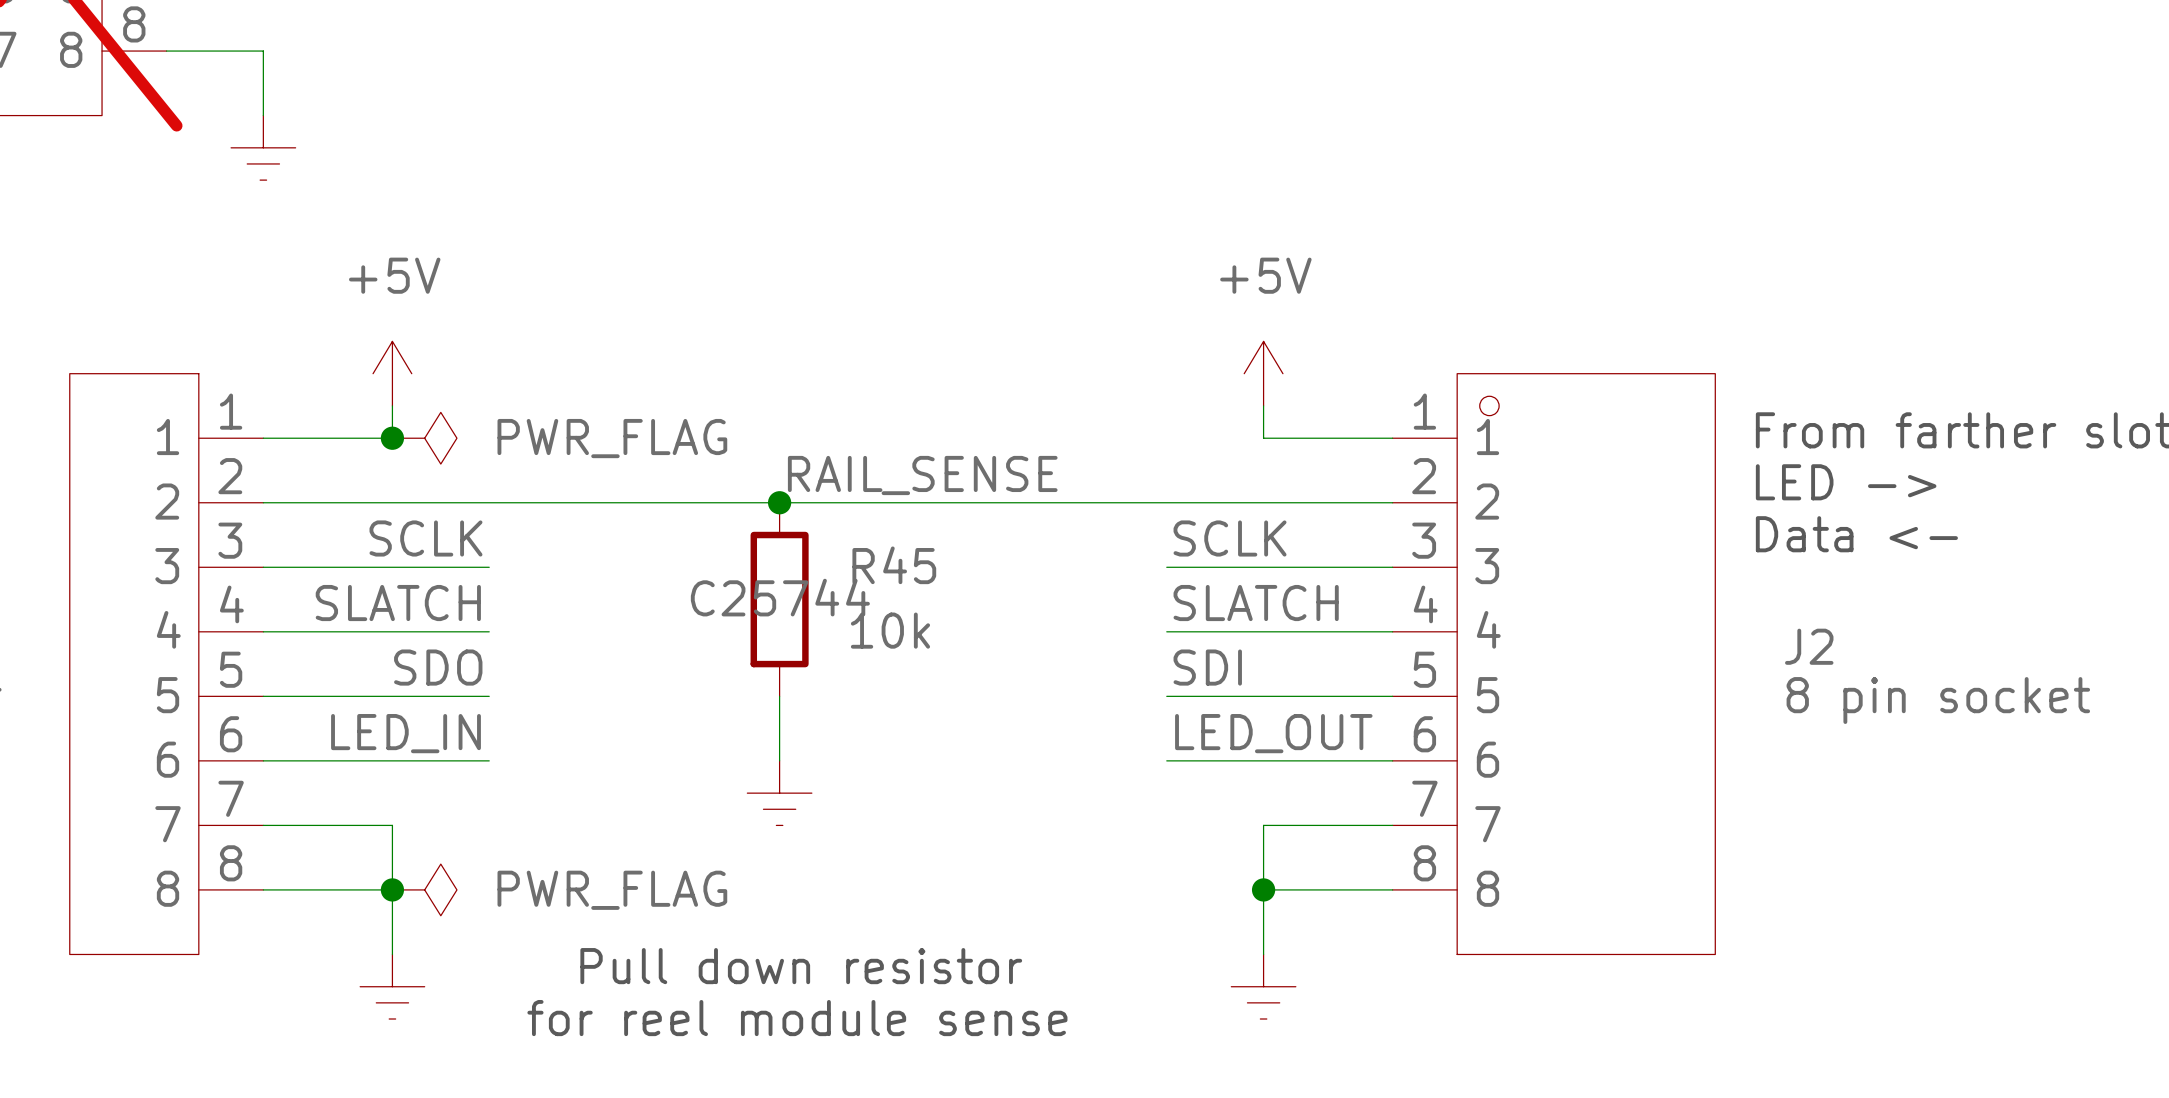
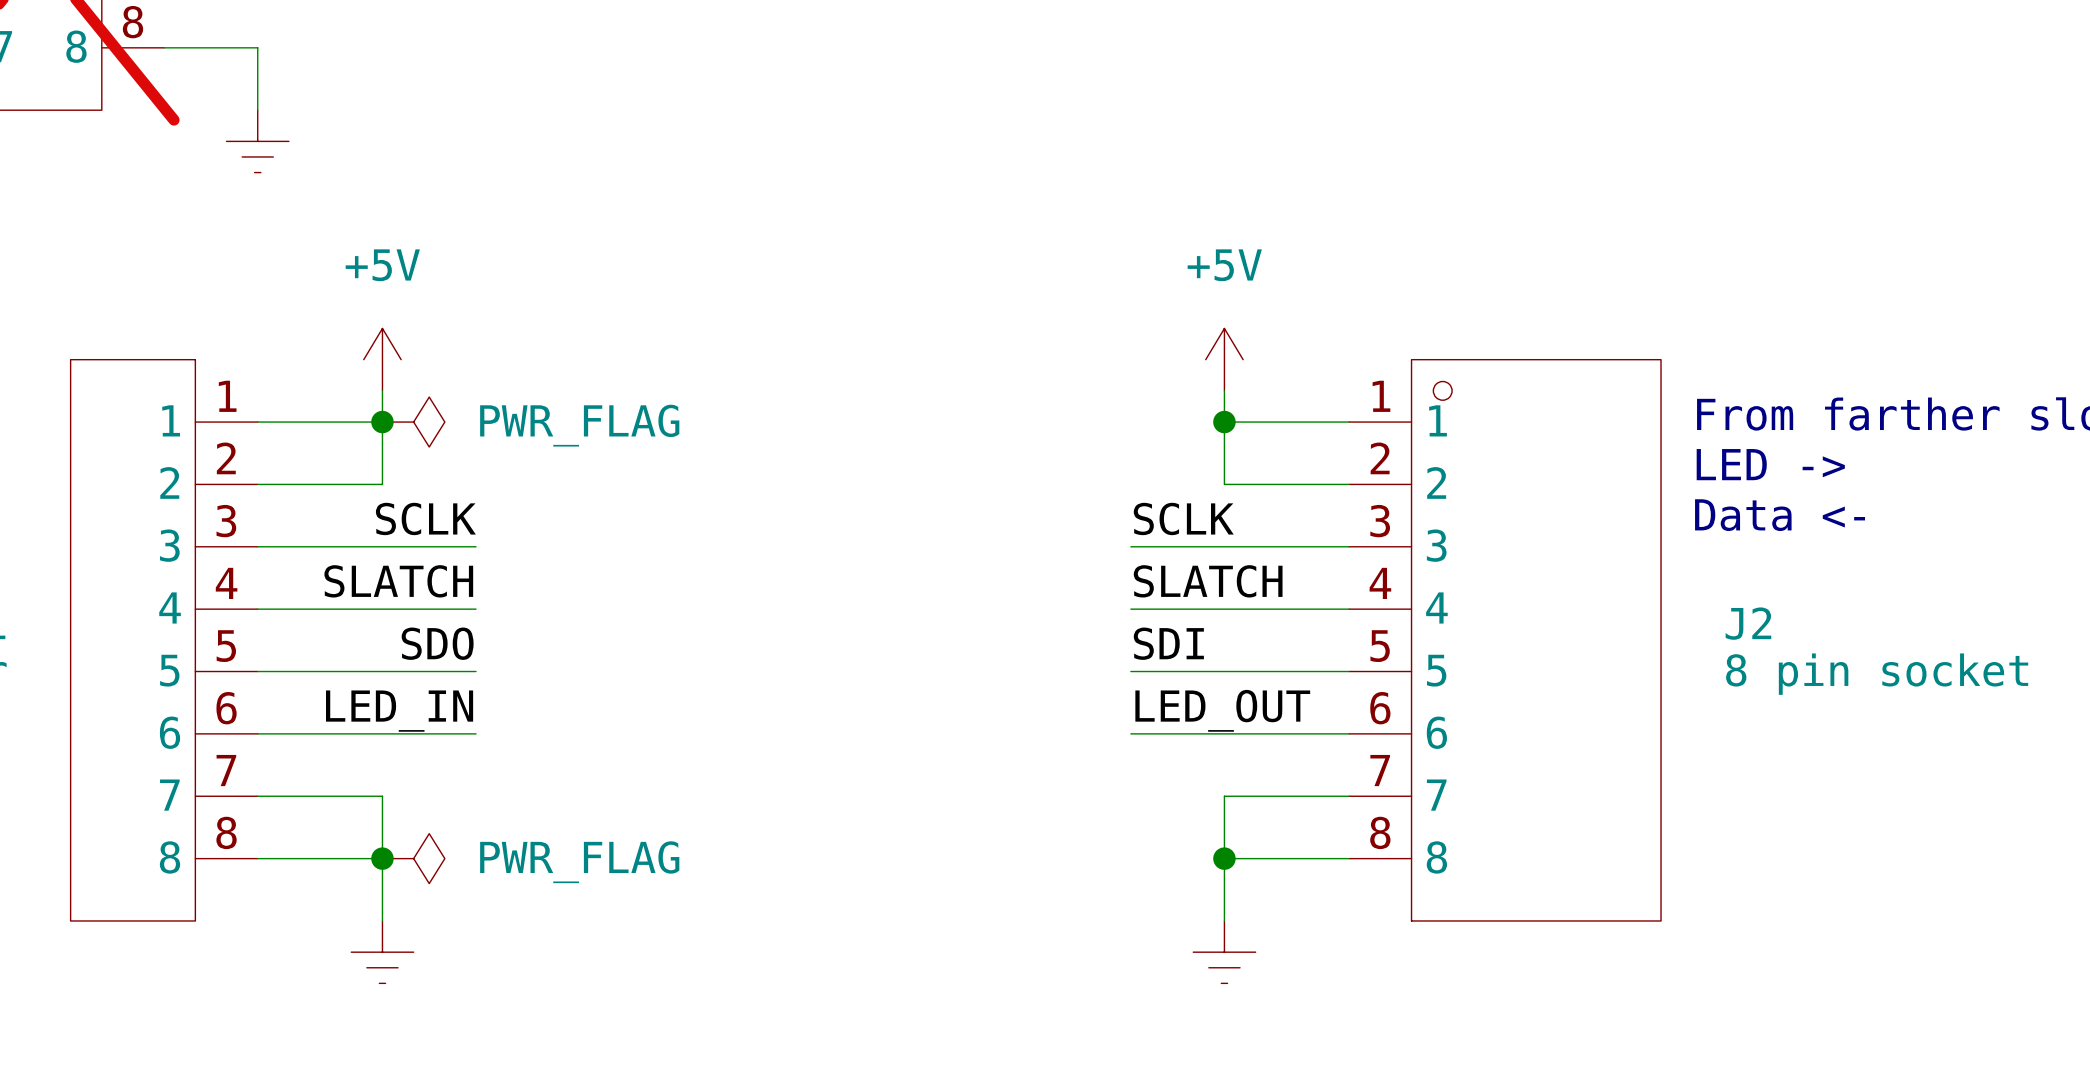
junction: none -> (1224, 422)
label: RAIL_SENSE (922, 475) -> none
wire: (392, 502) (1263, 502) -> (382, 484) (382, 422)
junction: (779, 502) -> none
R45: 10k (779, 599) -> none
wire: (779, 696) (779, 760) -> (1224, 422) (1224, 484)
power symbol: (779, 793) -> none
text: Pull down resistor (801, 966) -> none
text: for reel module sense (797, 1018) -> none

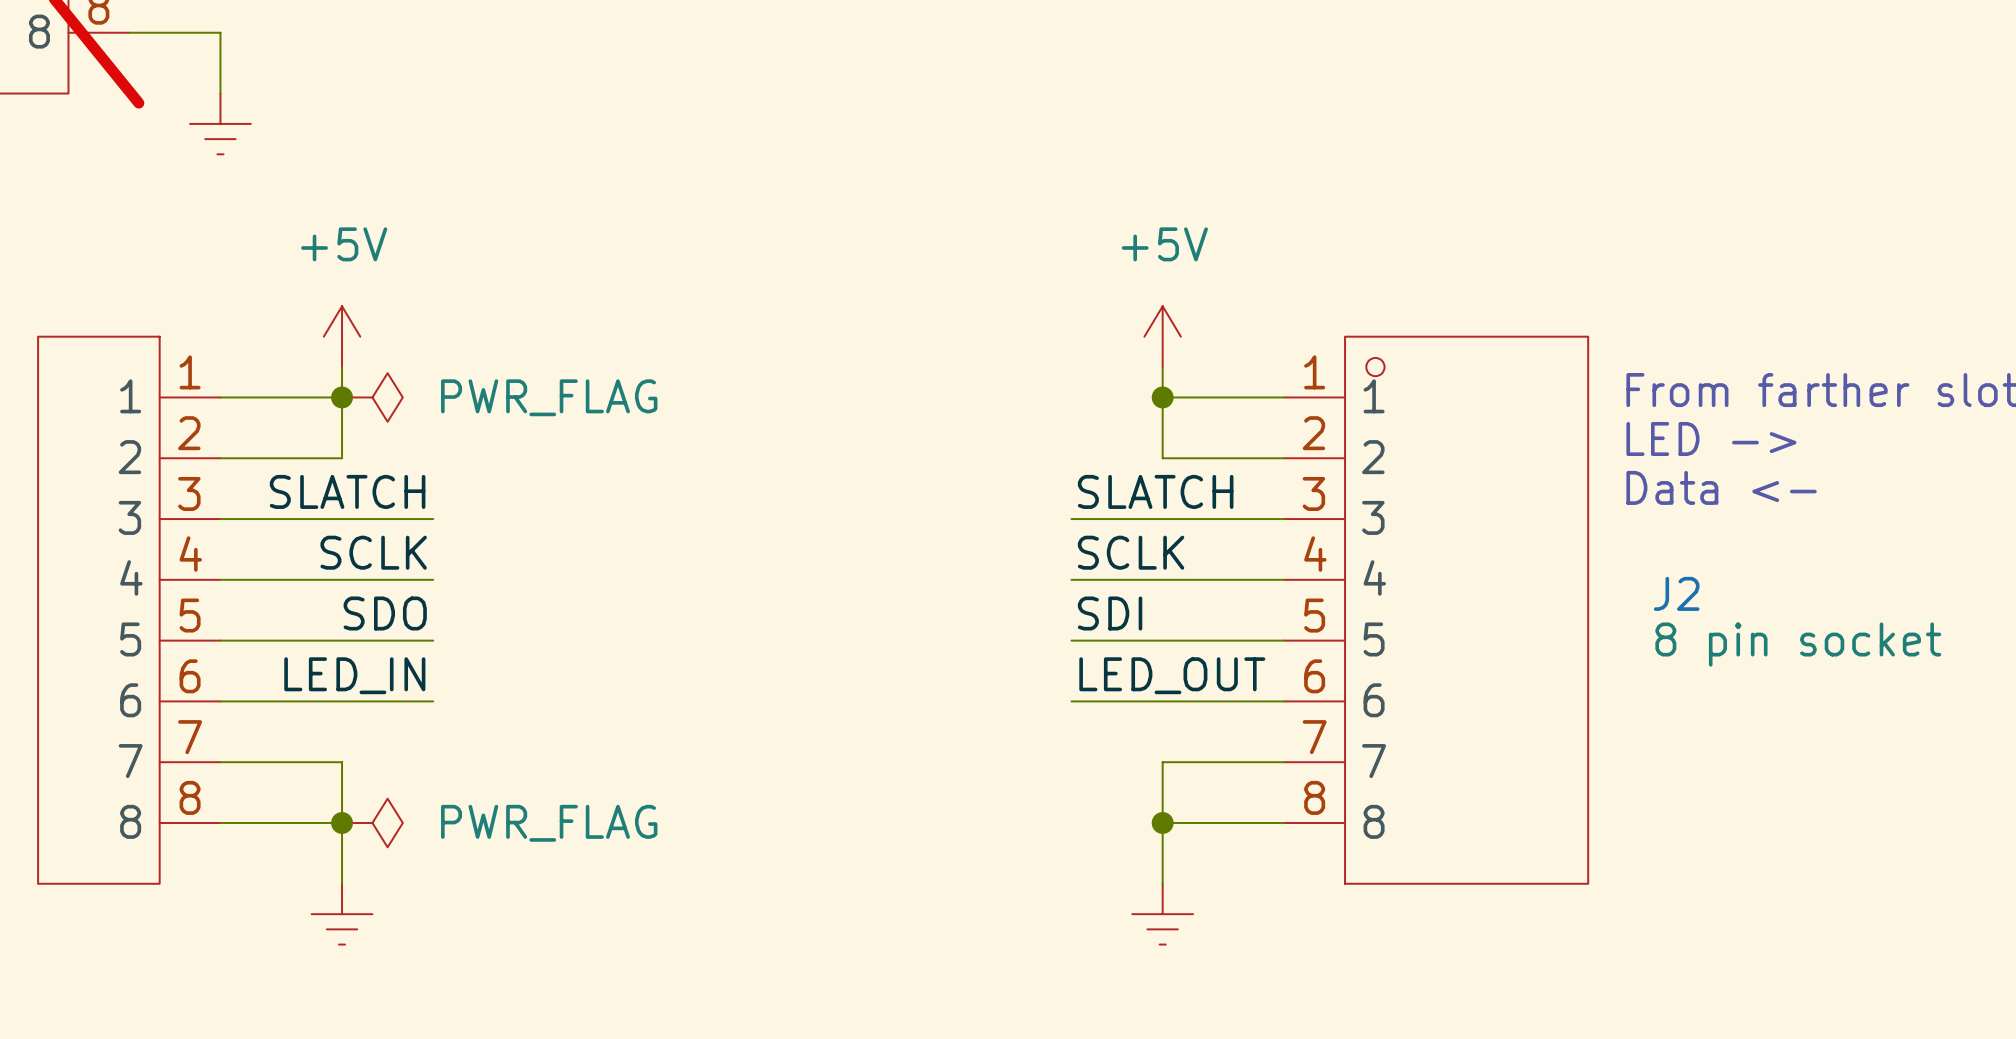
label: SCLK (425, 518) -> SLATCH (347, 491)
label: SCLK (1183, 518) -> SLATCH (1155, 491)
label: SLATCH (398, 581) -> SCLK (373, 552)
label: SLATCH (1208, 581) -> SCLK (1131, 552)

